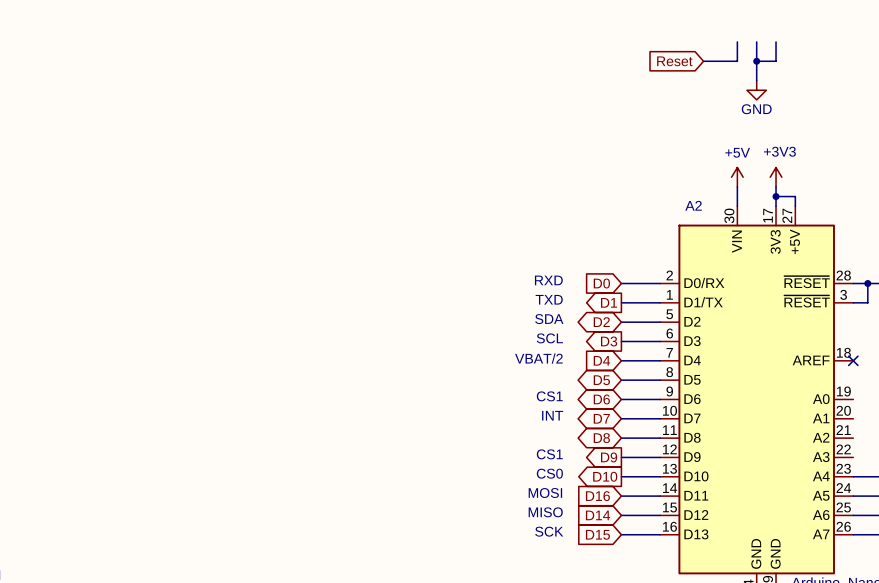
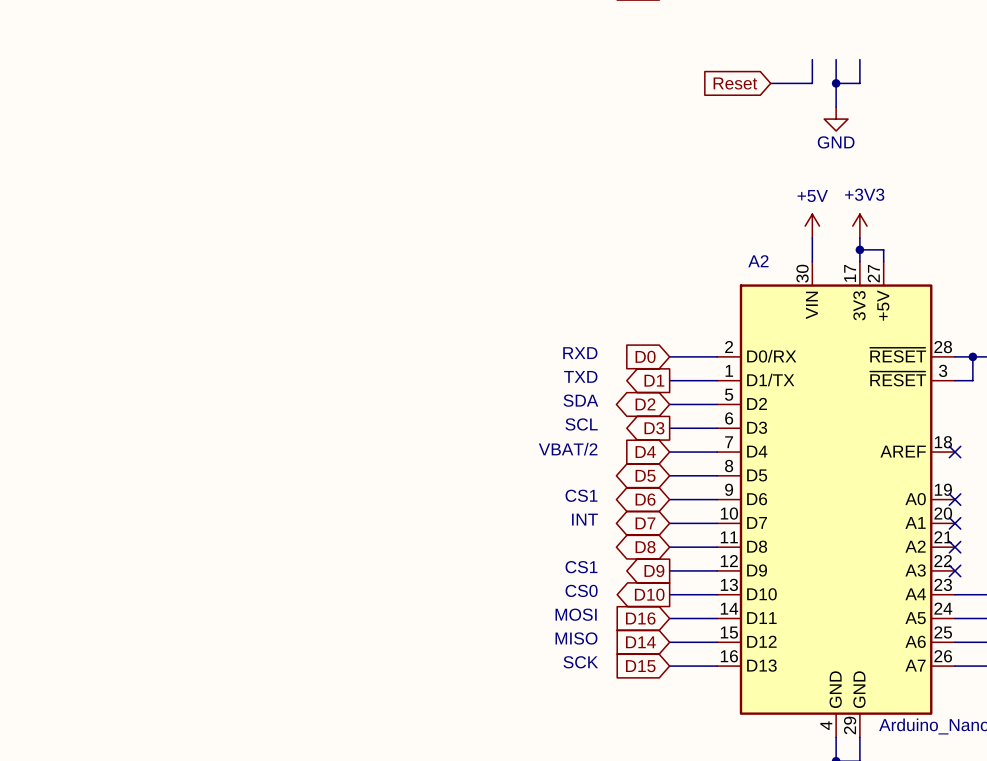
no-connect mark: none -> (955, 499)
no-connect mark: none -> (955, 523)
no-connect mark: none -> (955, 547)
no-connect mark: none -> (955, 570)

